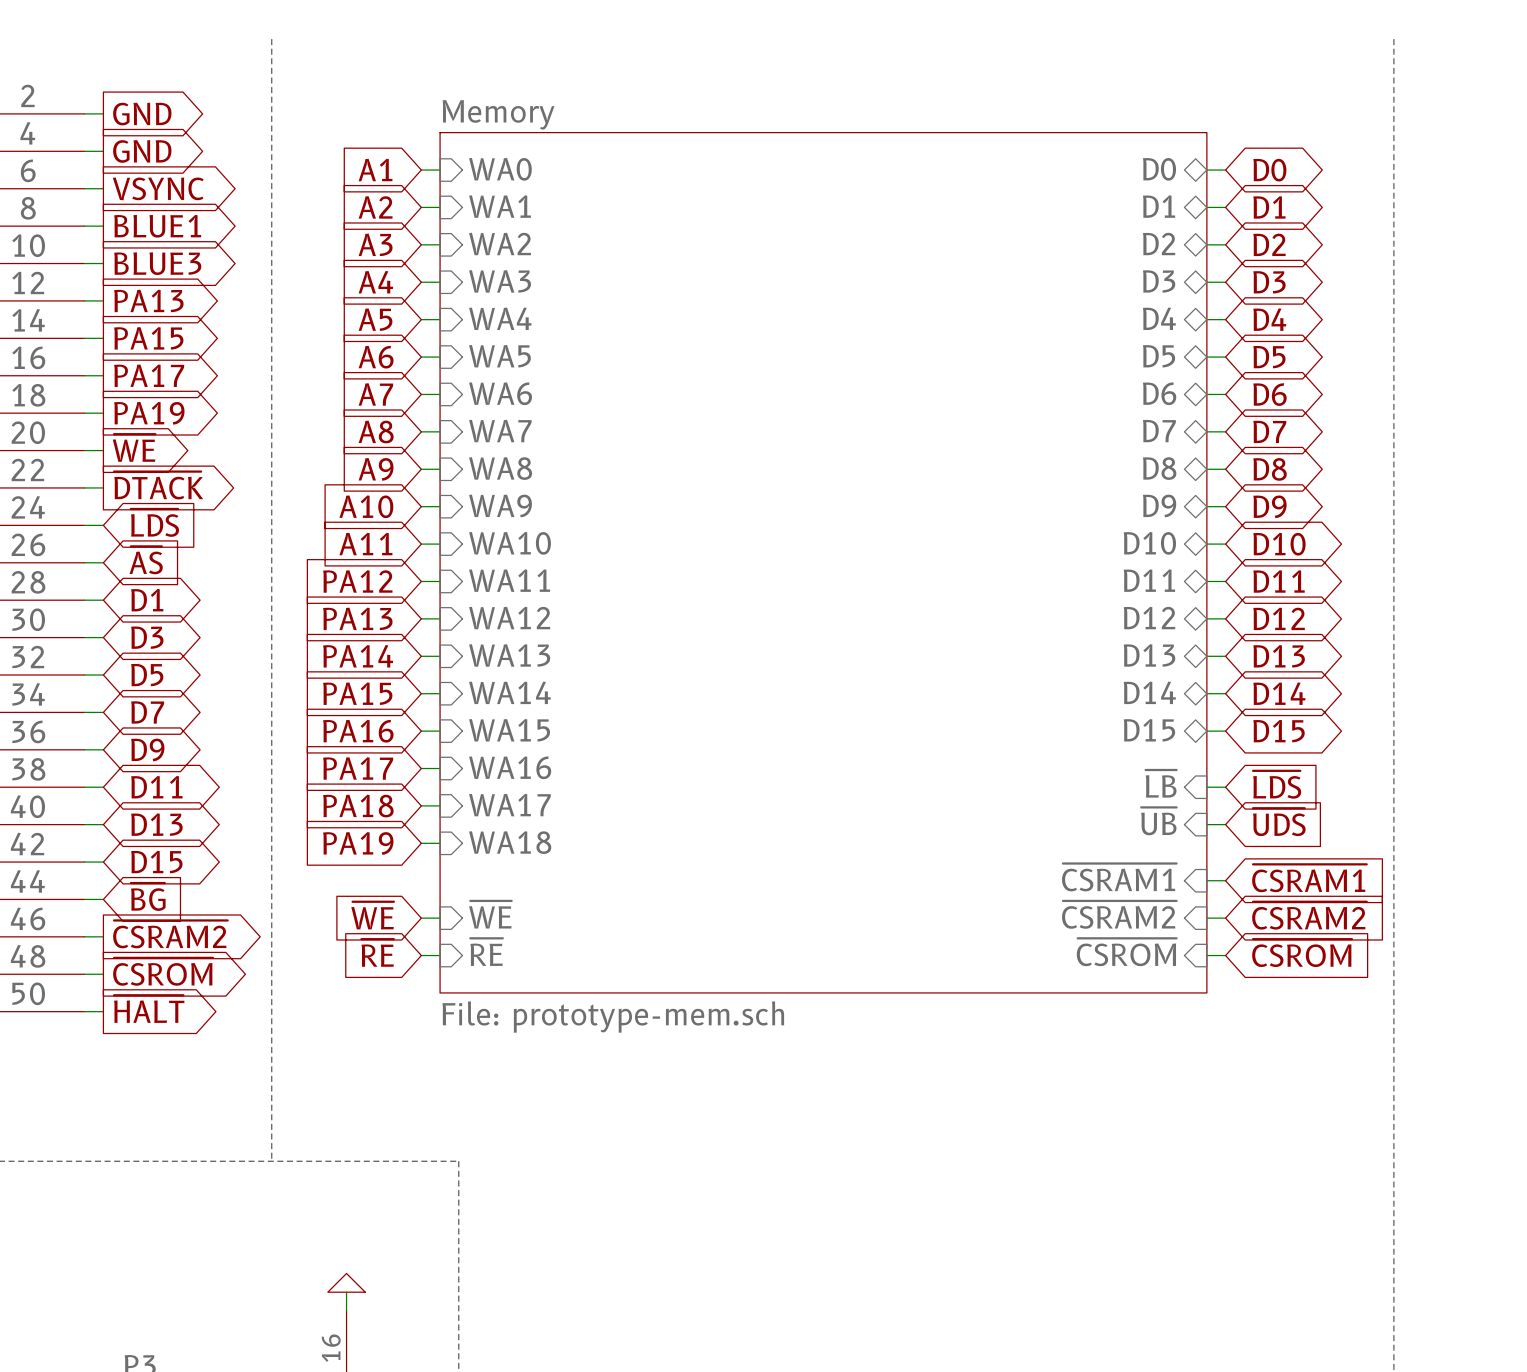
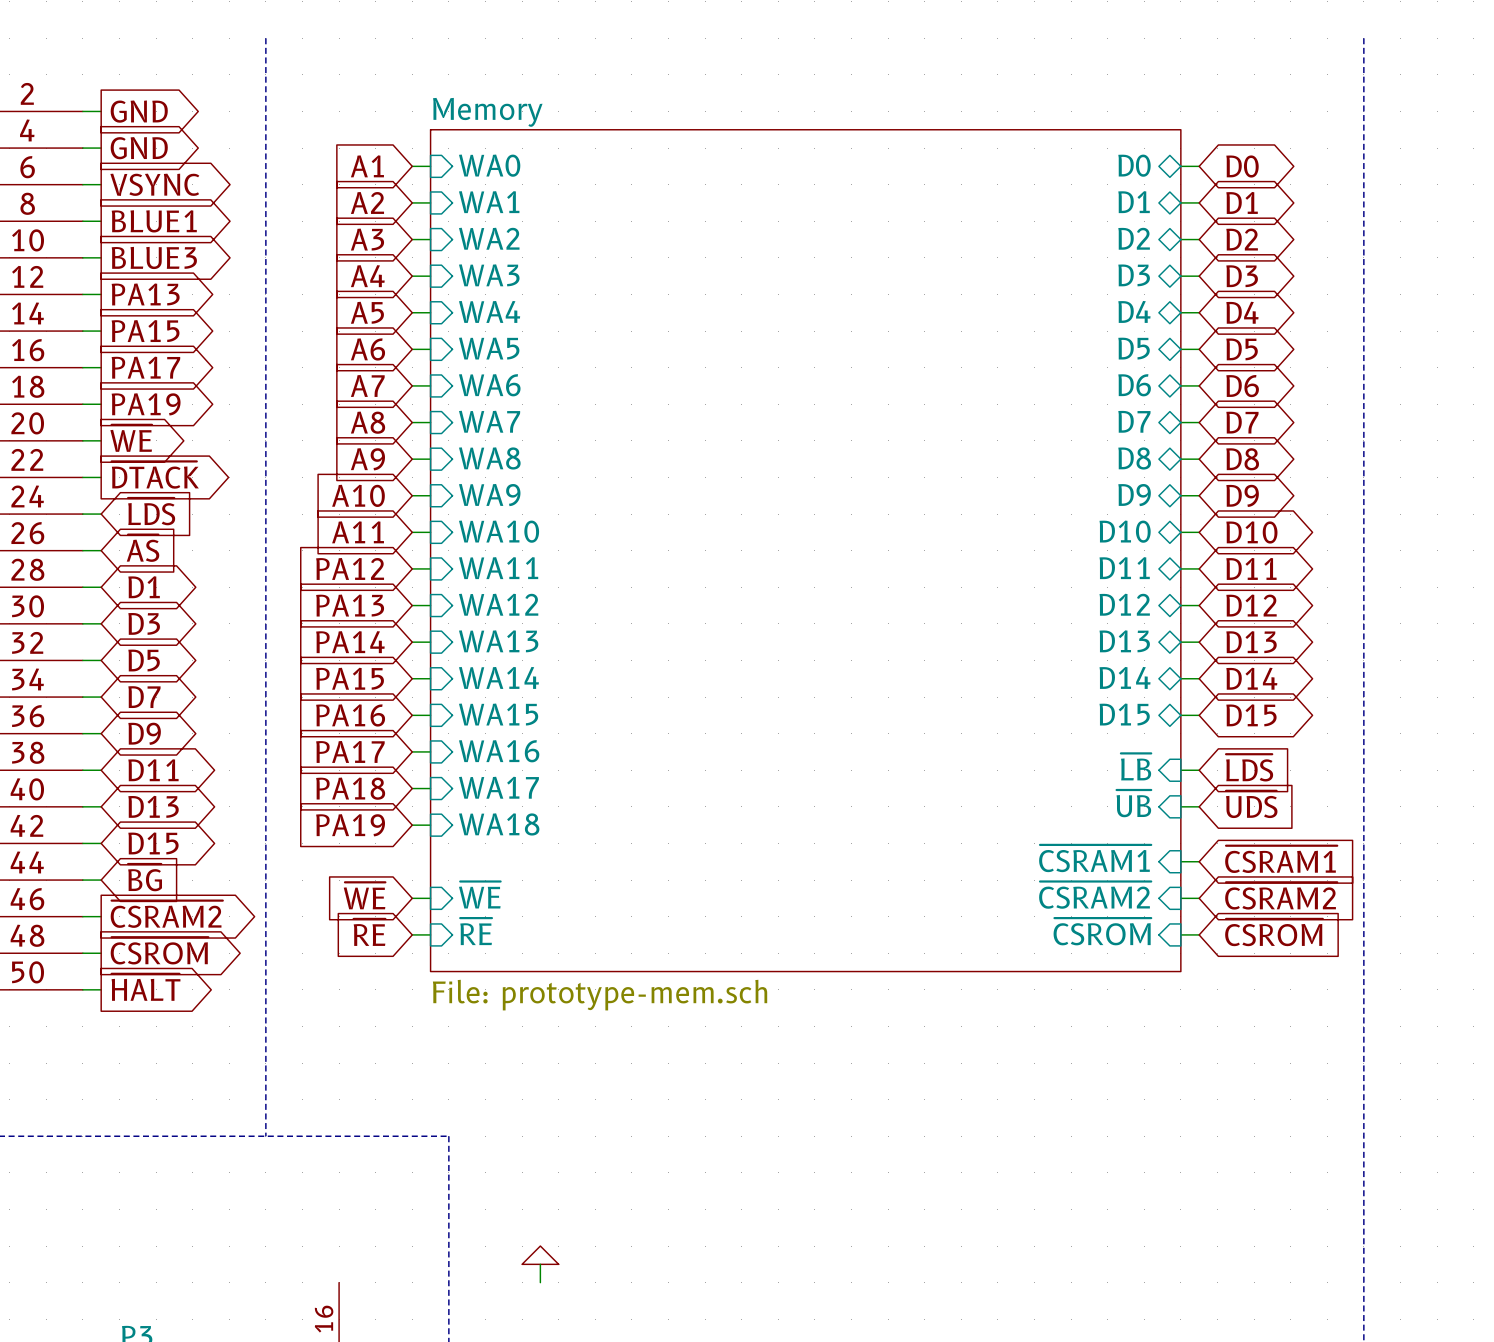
power symbol position: (346, 1282) -> (540, 1255)
wire: (346, 1292) (346, 1310) -> (540, 1264) (540, 1282)

